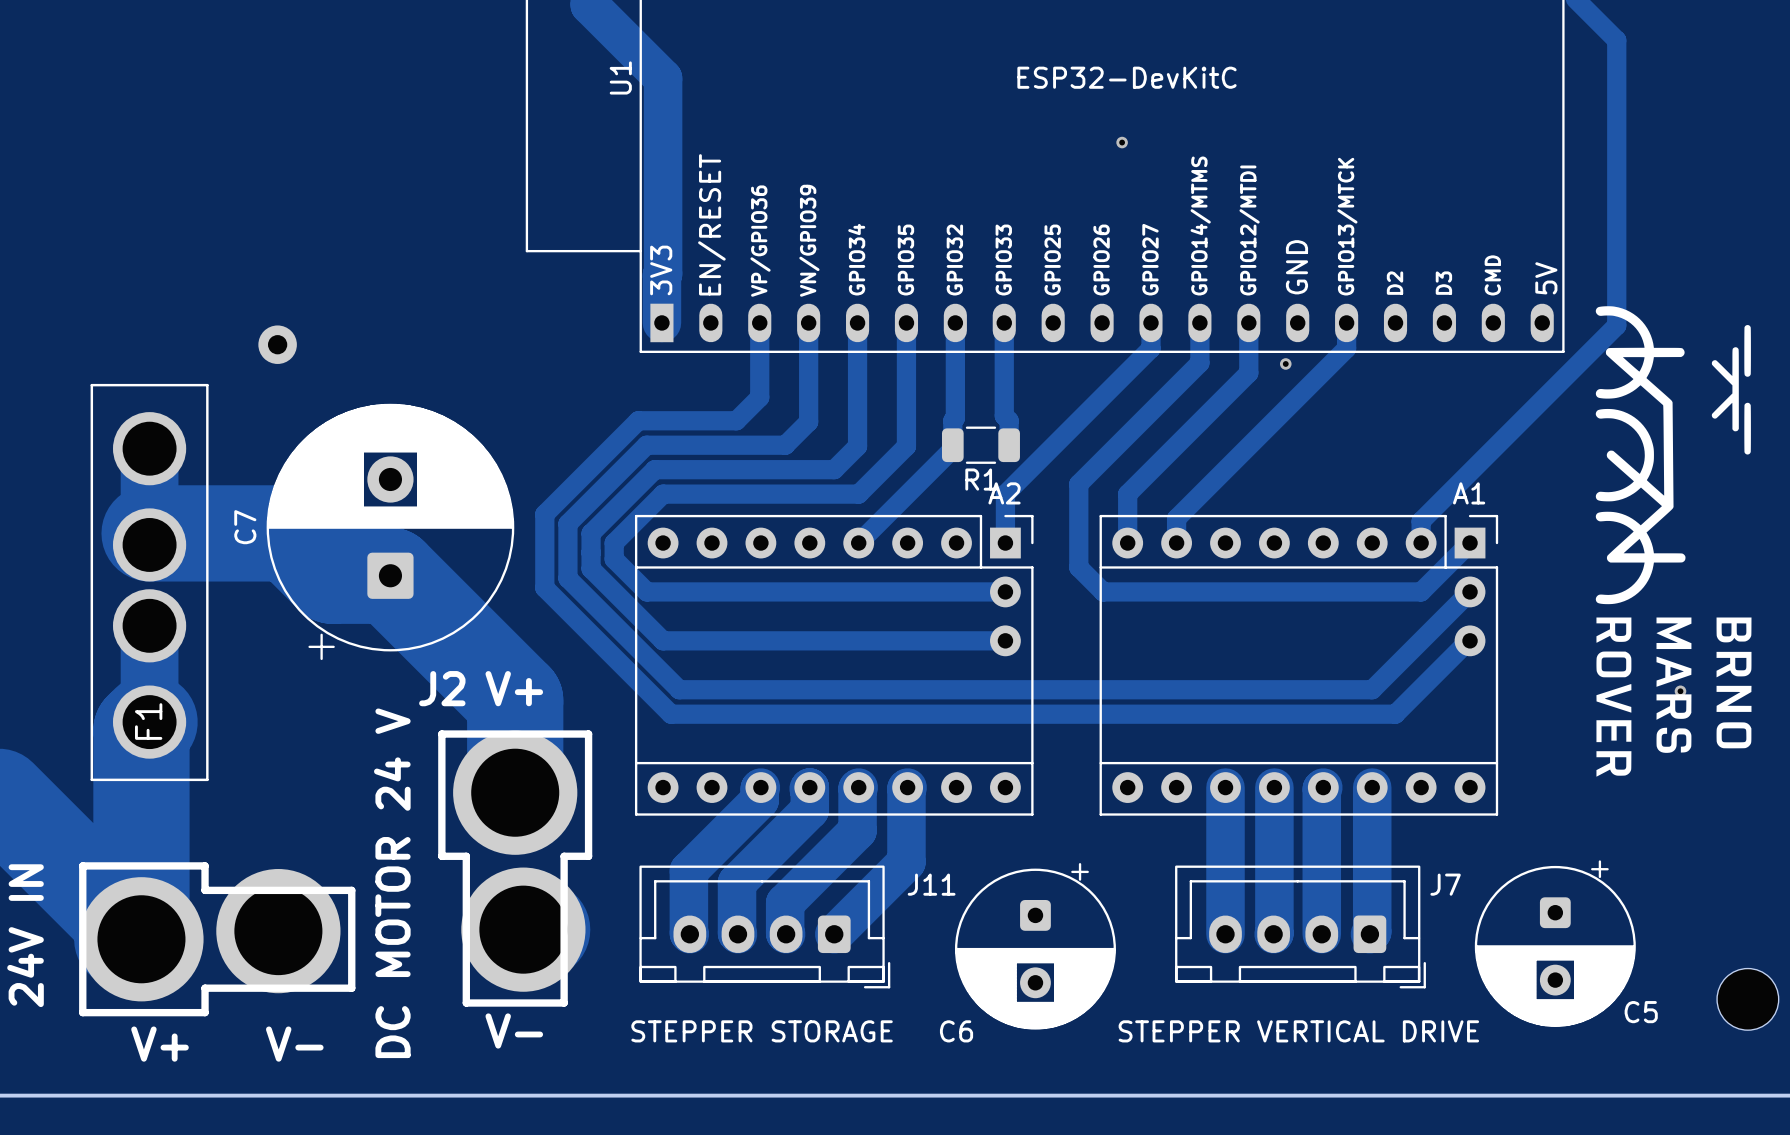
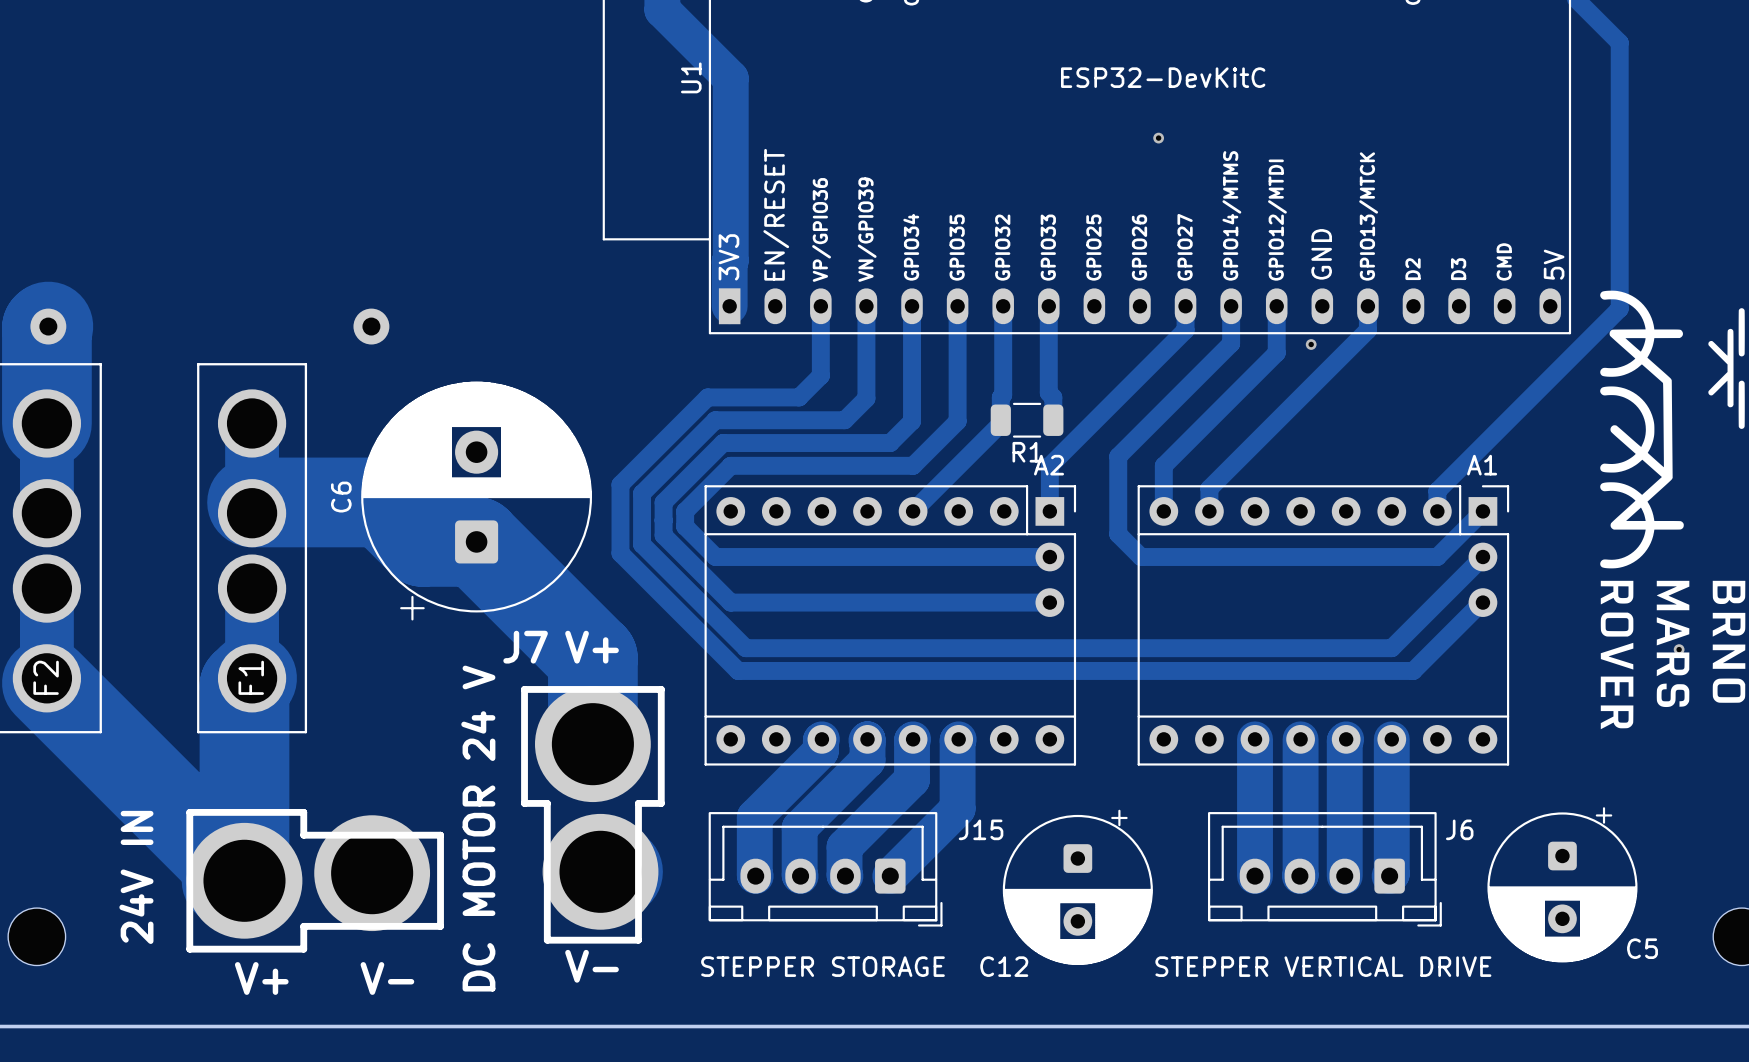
C7 name: C7 (245, 527) -> C6 (341, 497)
J2 name: J2 (442, 688) -> J7 (525, 647)
J11 name: J11 (931, 884) -> J15 (981, 829)
J7 name: J7 (1445, 884) -> J6 (1459, 829)
C6 name: C6 (956, 1031) -> C12 (1004, 966)

